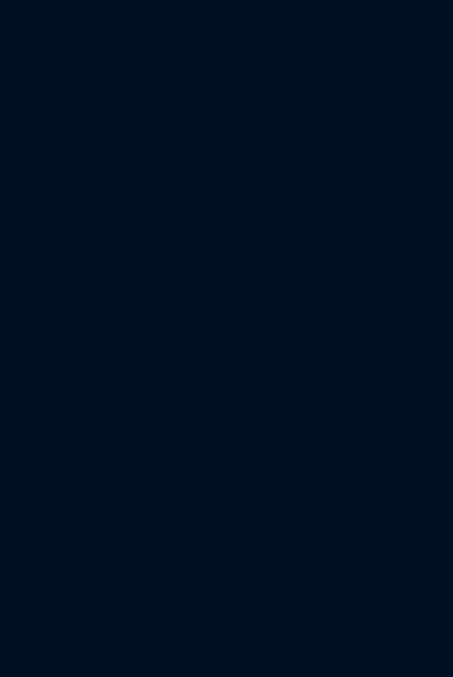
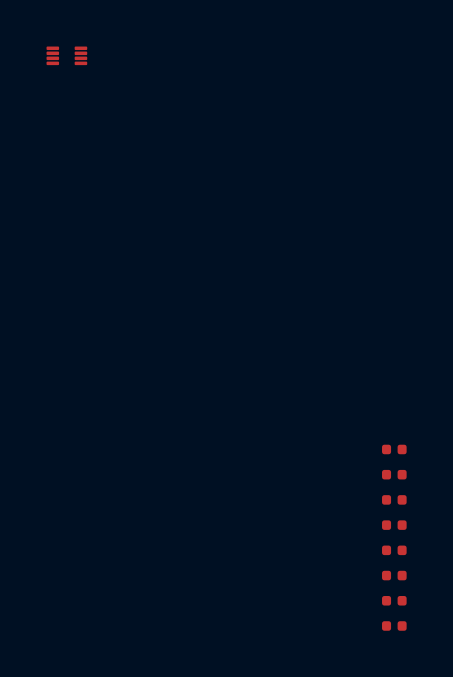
part: none -> (66, 55)
part: none -> (394, 449)
part: none -> (394, 474)
part: none -> (394, 499)
part: none -> (394, 525)
part: none -> (394, 550)
part: none -> (394, 575)
part: none -> (394, 600)
part: none -> (394, 625)

